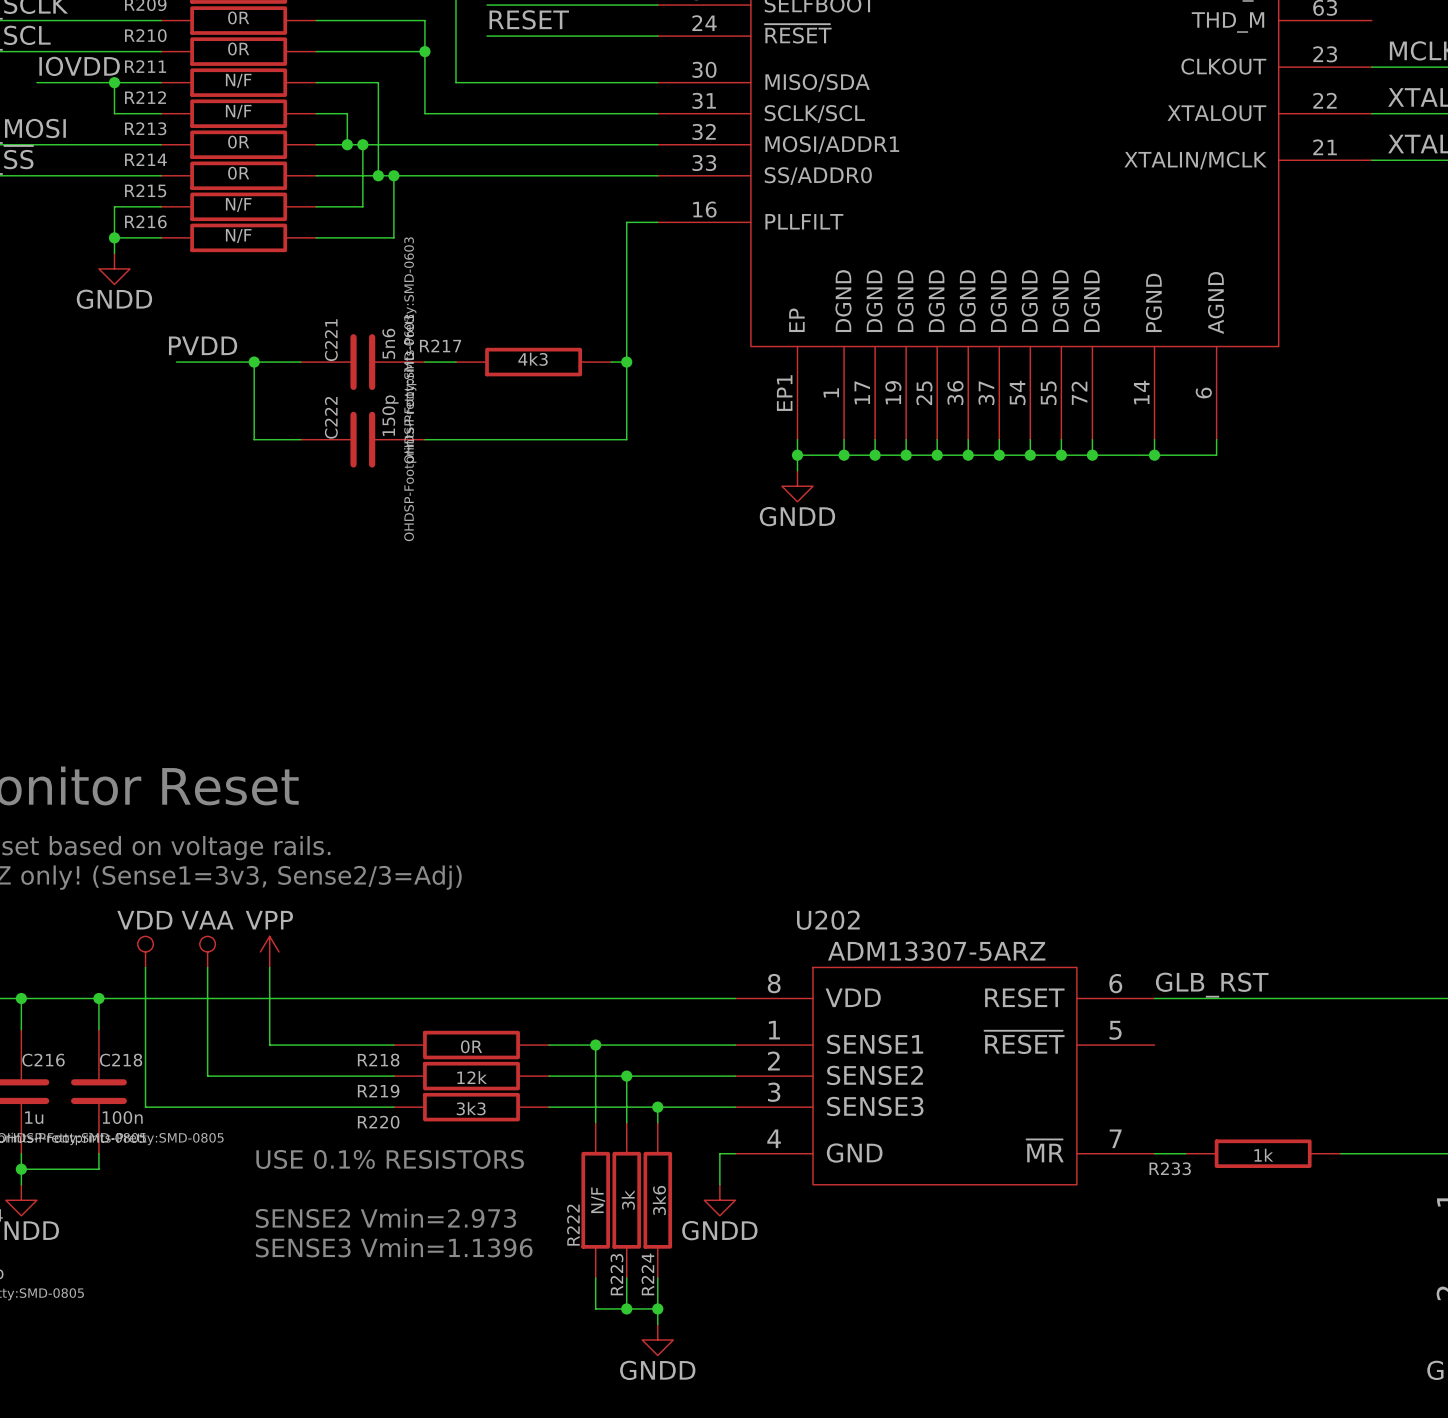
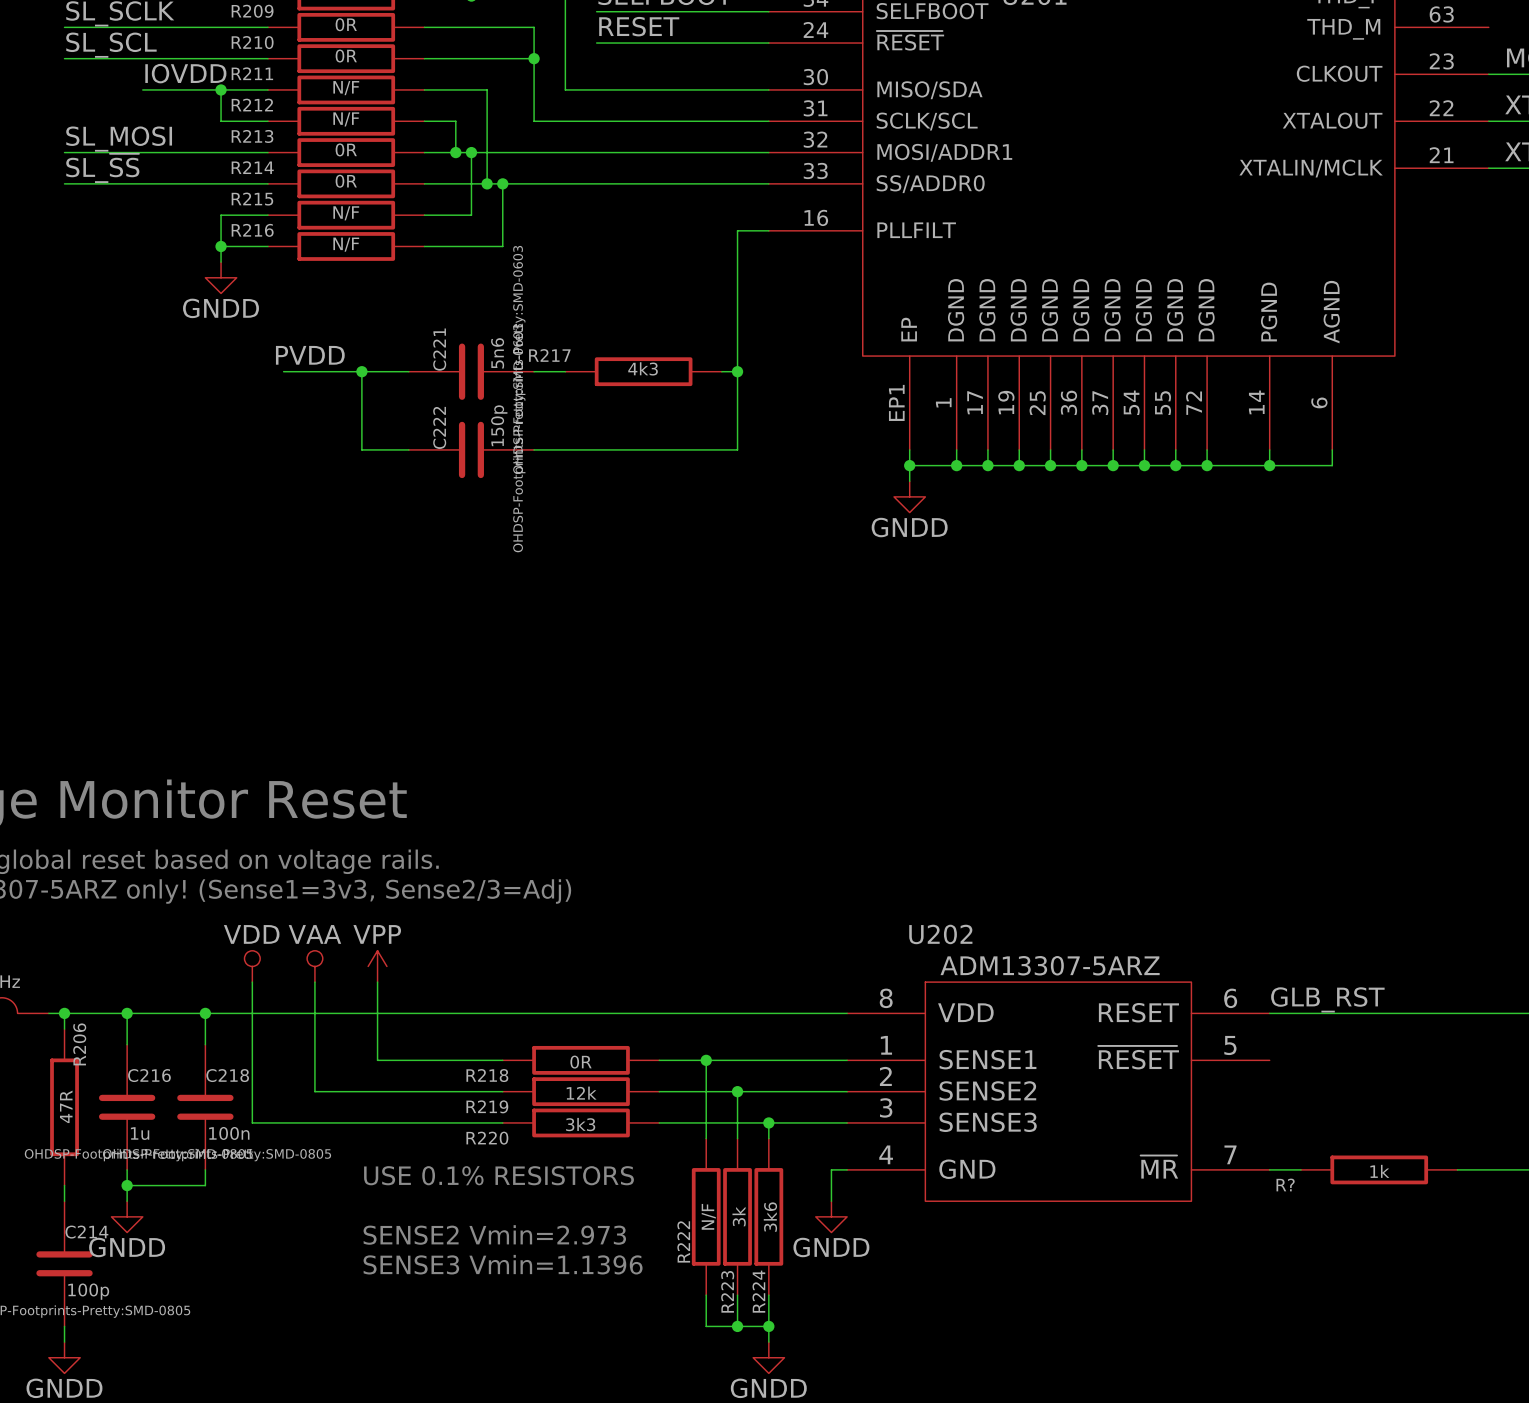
R233 name: R233 (1170, 1168) -> R? (1285, 1184)

